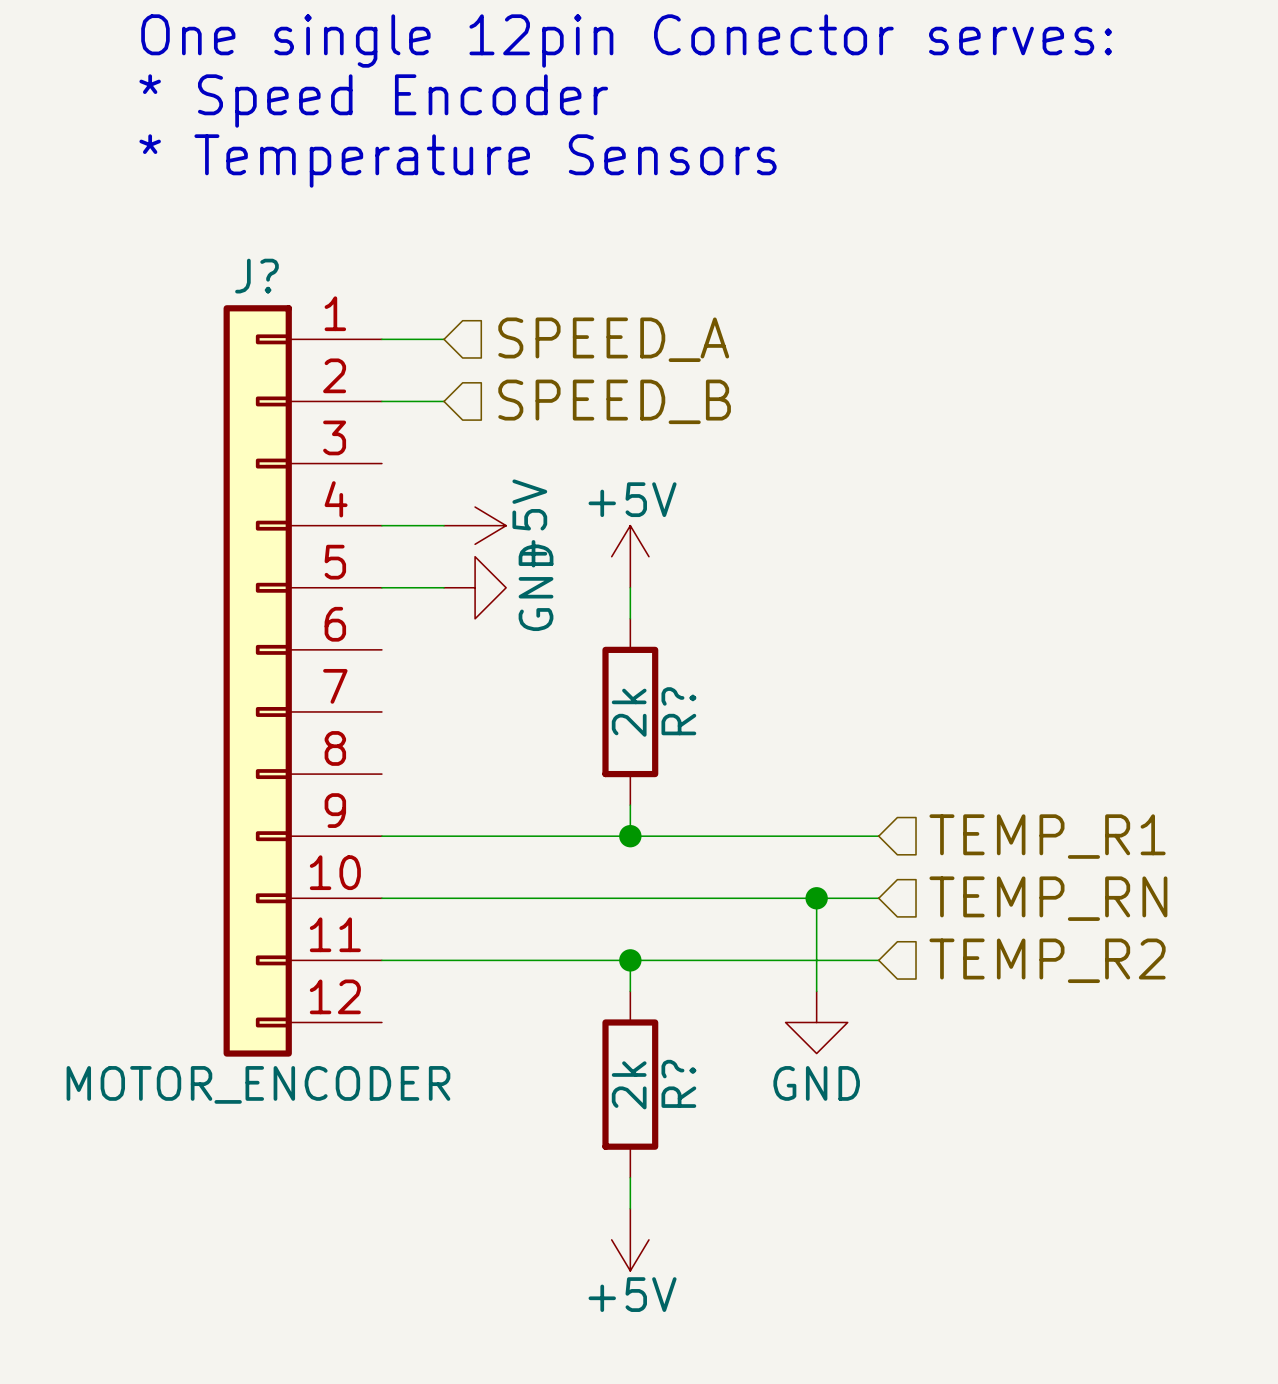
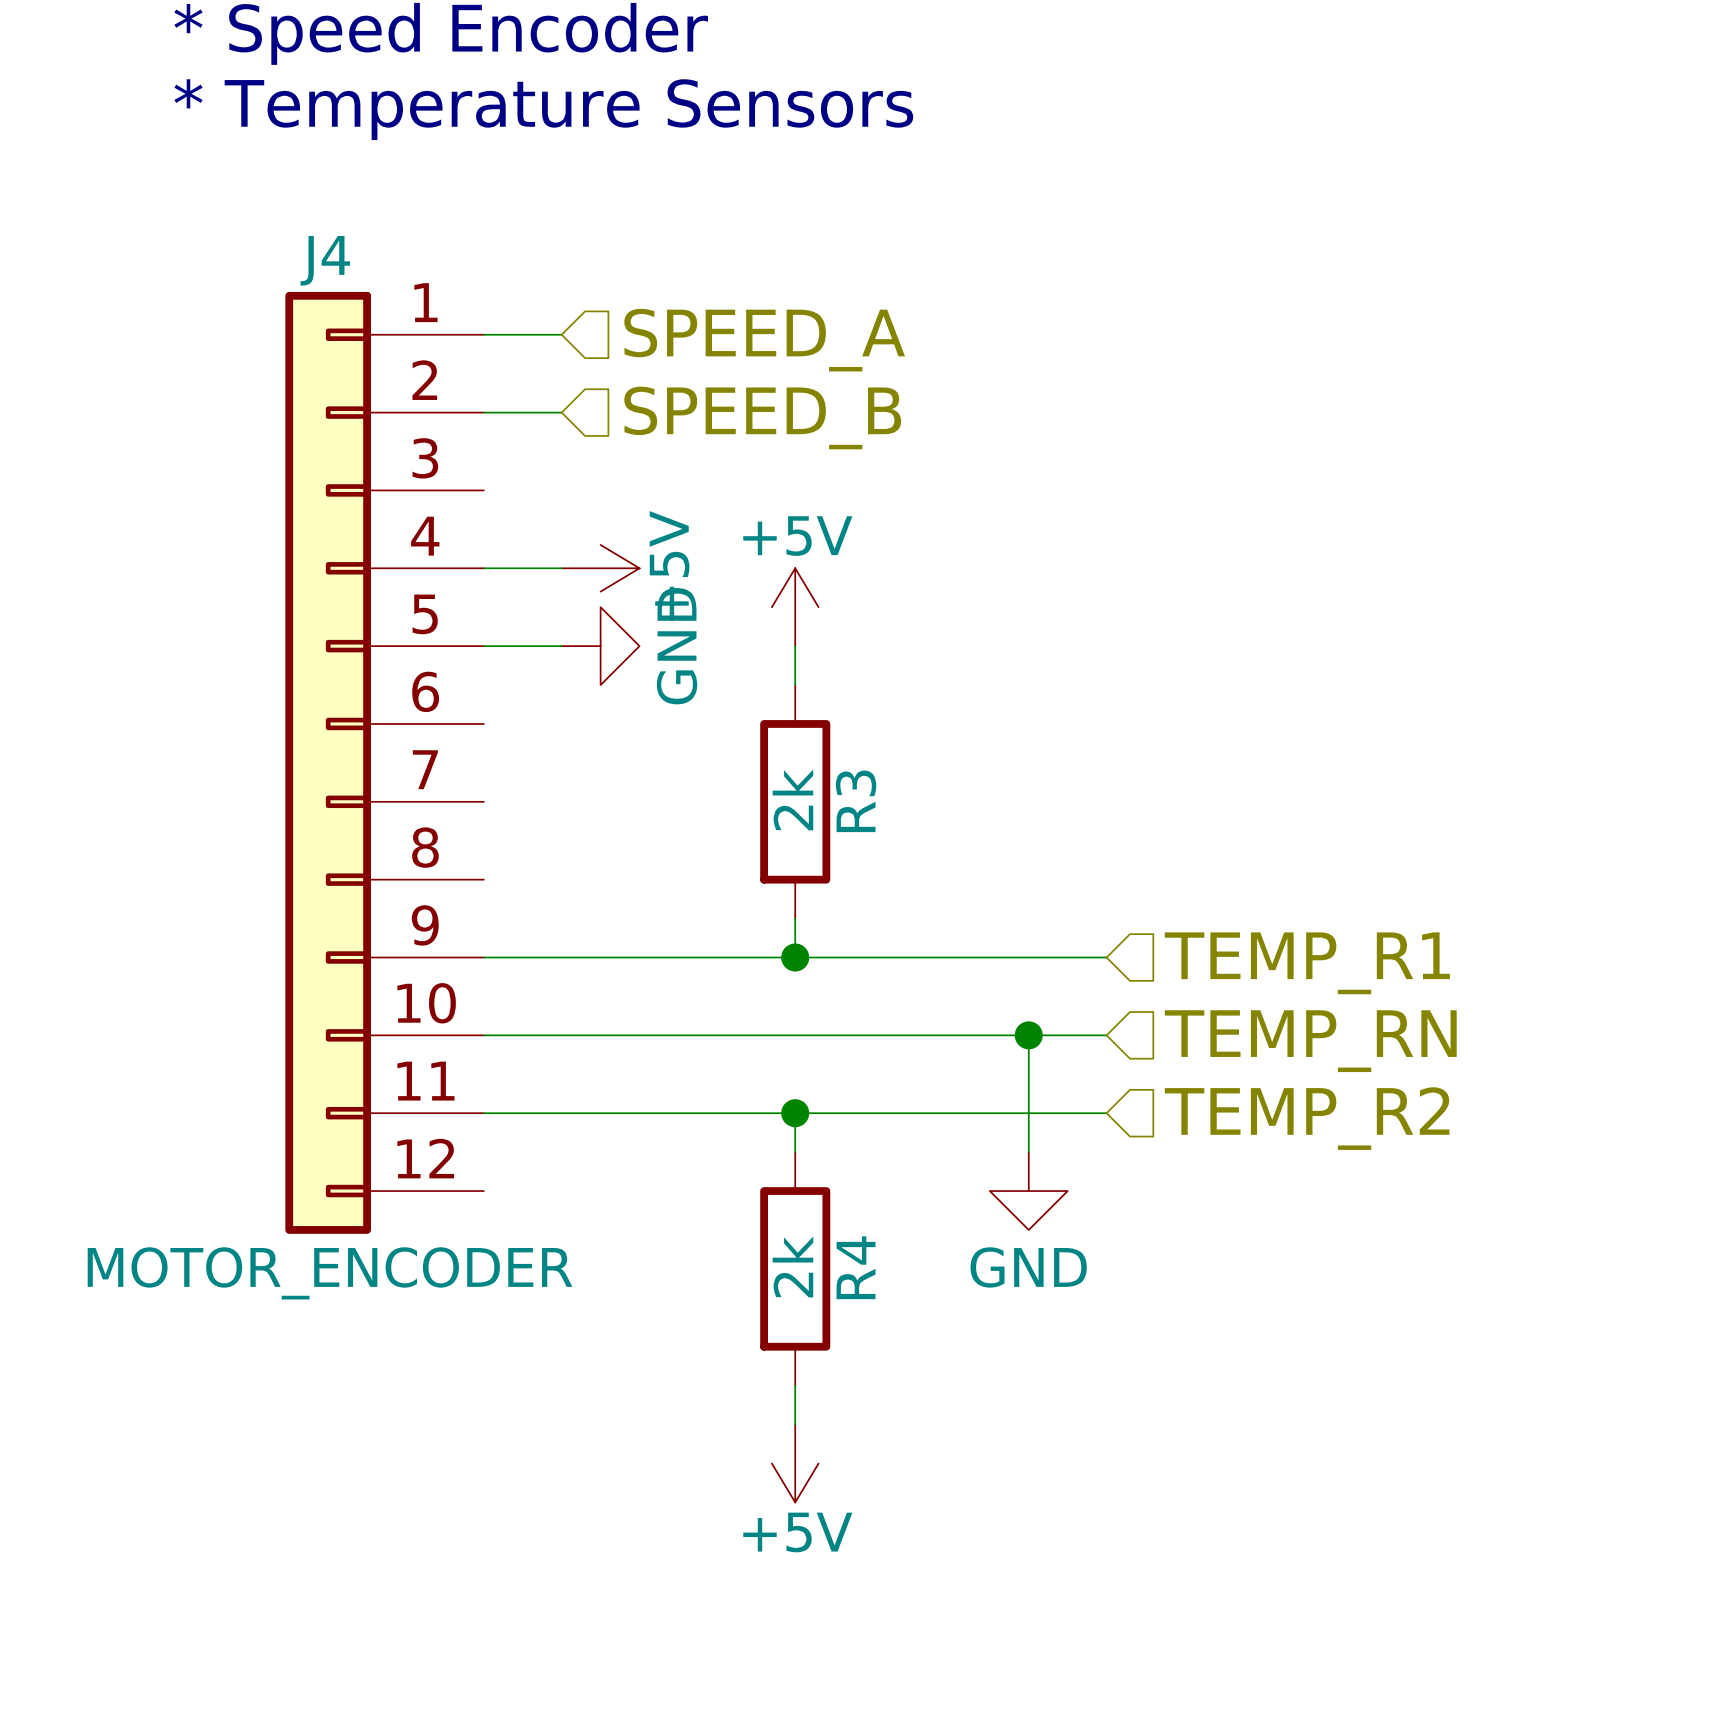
J? name: J? (256, 276) -> J4 (325, 260)
R? name: R? (678, 711) -> R3 (856, 801)
R? name: R? (678, 1083) -> R4 (856, 1267)

